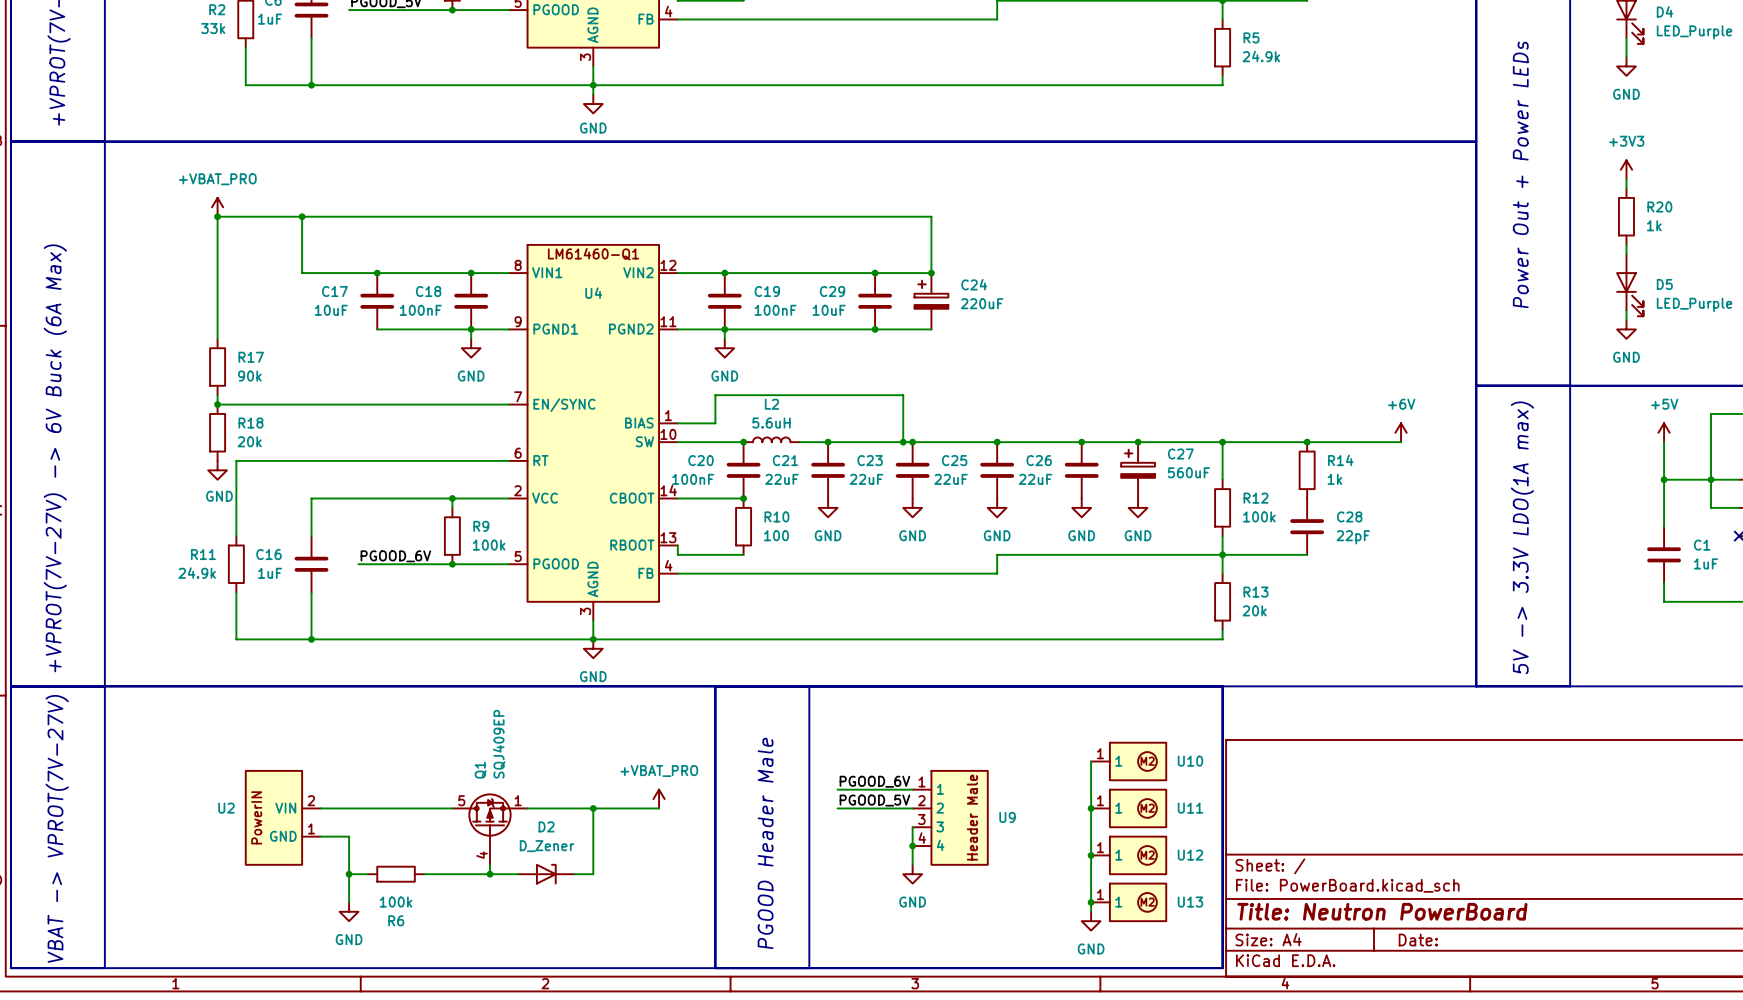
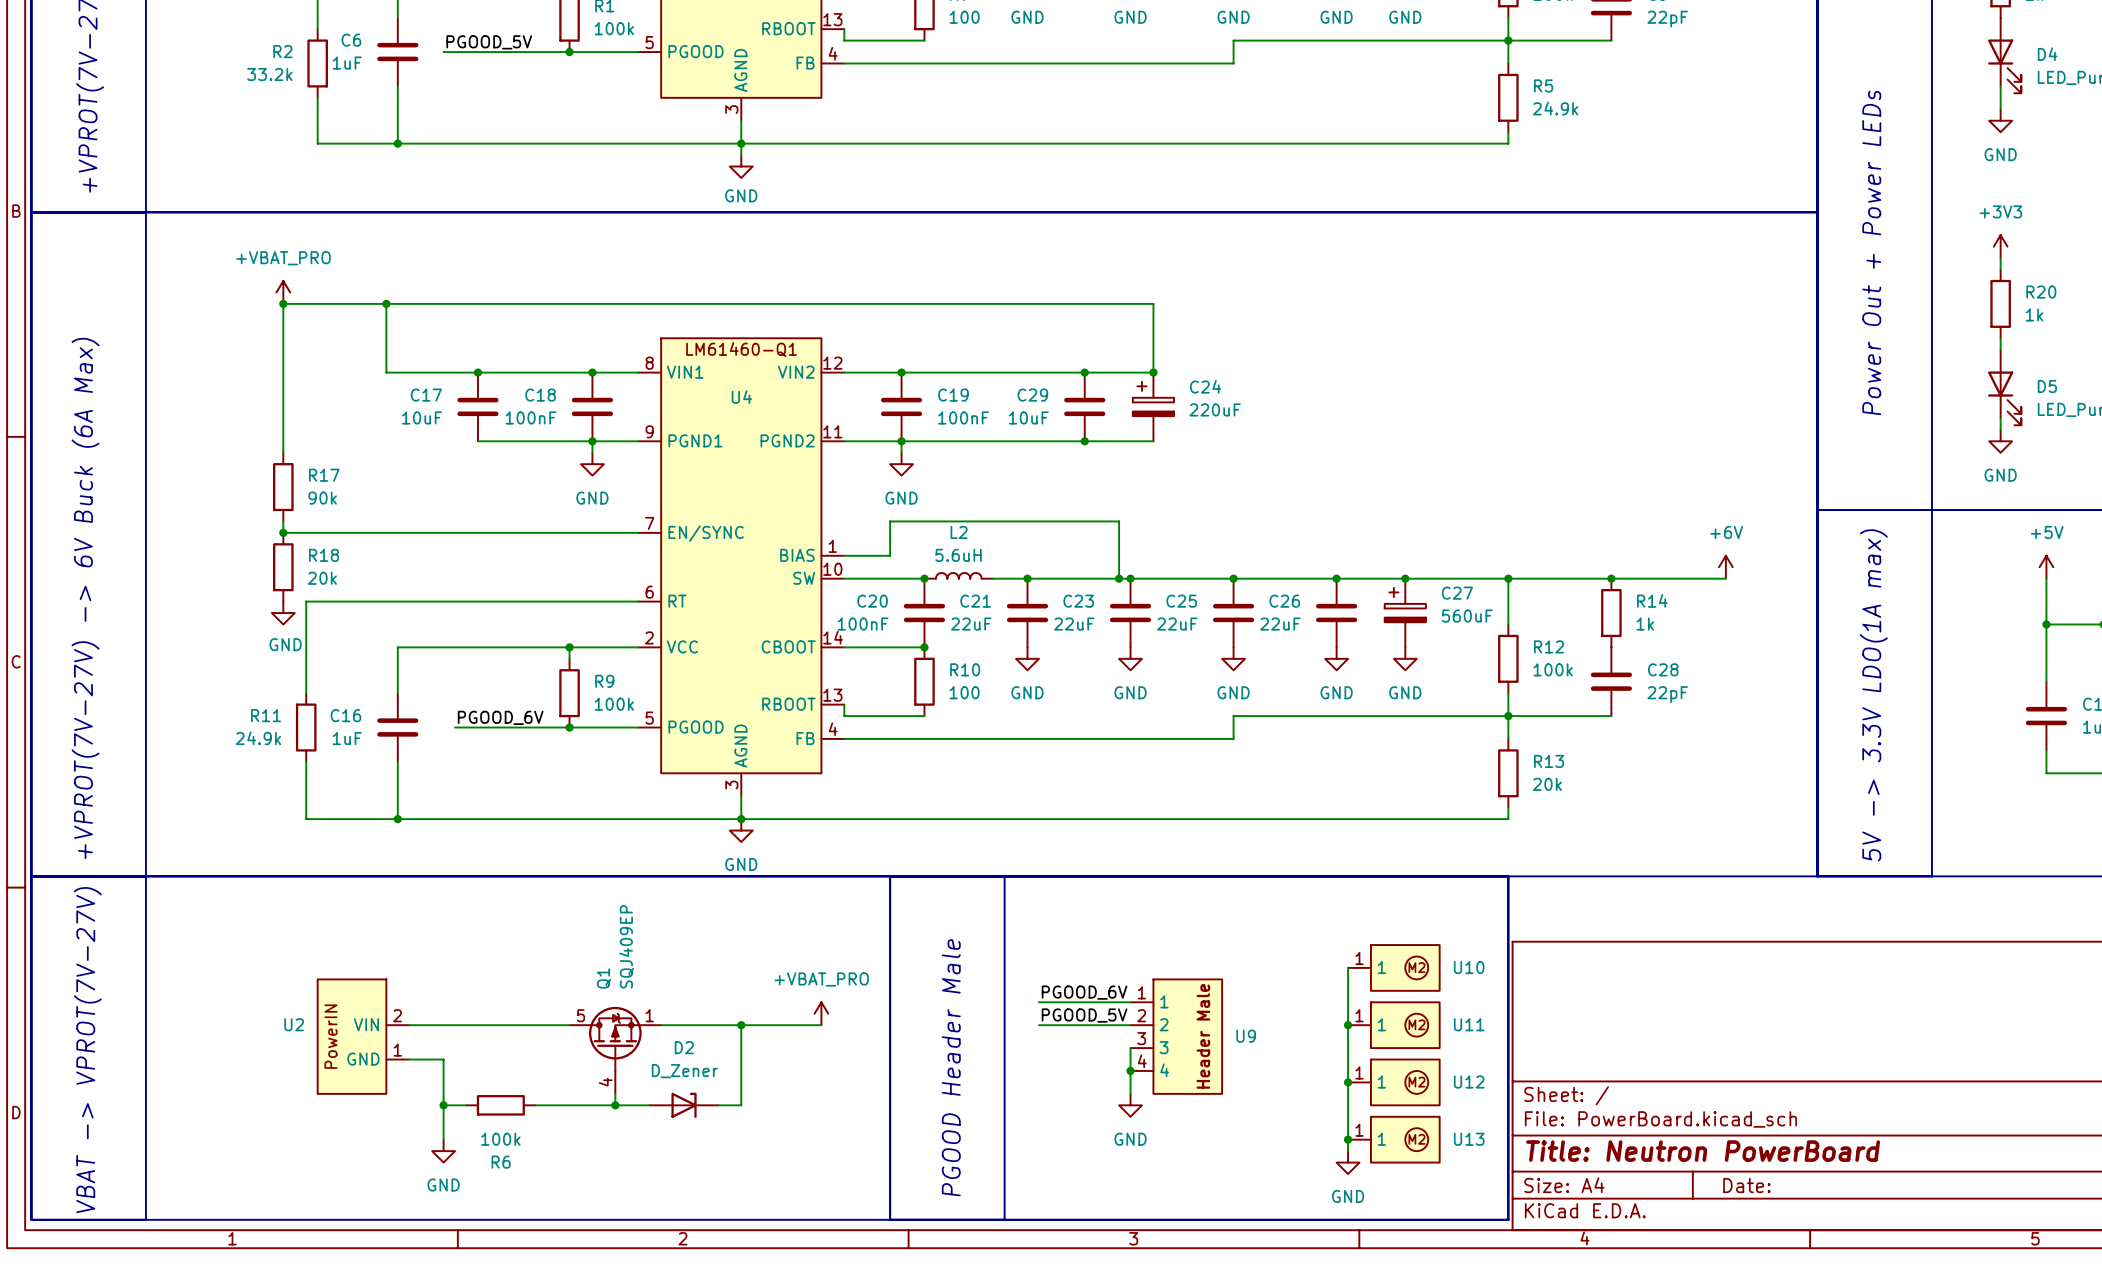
R2 value: 33k (213, 28) -> 33.2k (269, 74)

